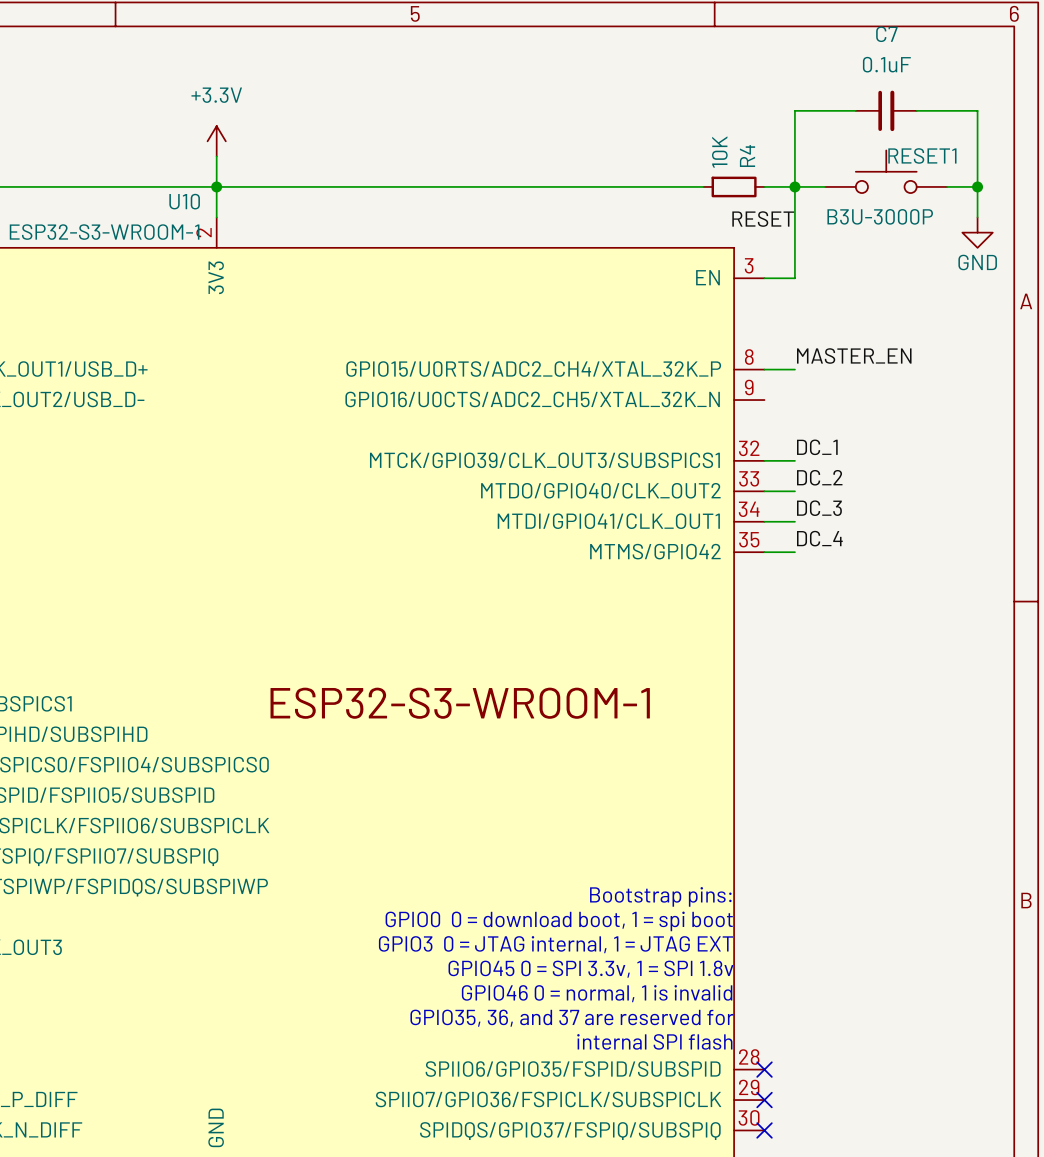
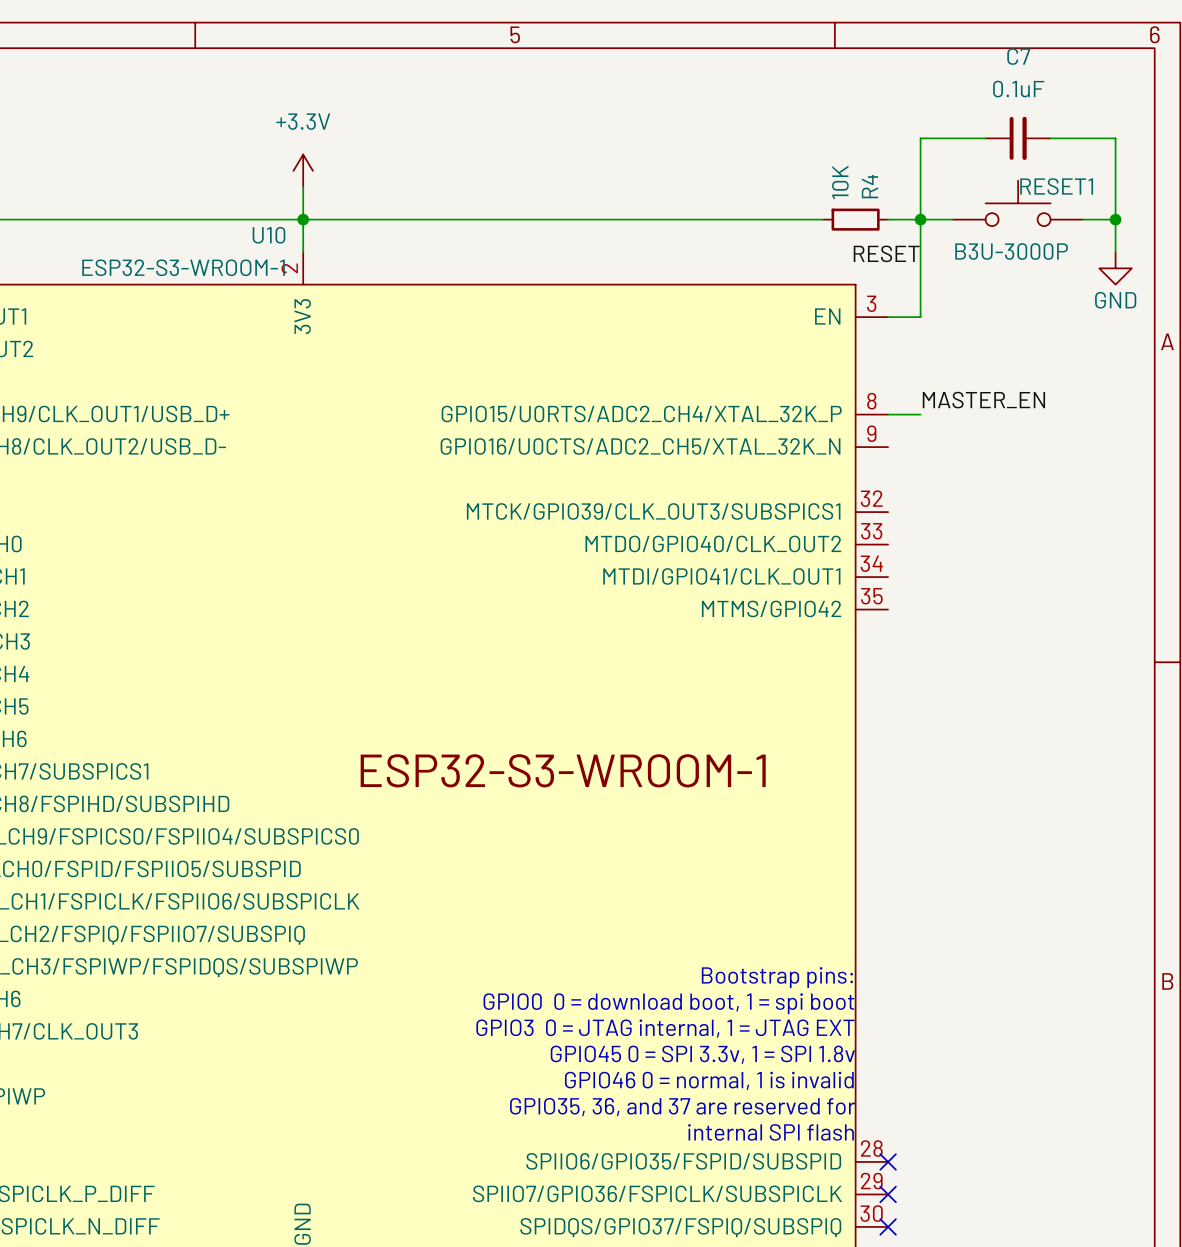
label: DC_1 (817, 447) -> none
wire: (764, 460) (794, 460) -> none
label: DC_2 (819, 477) -> none
wire: (764, 491) (794, 491) -> none
label: DC_3 (819, 508) -> none
wire: (764, 521) (794, 521) -> none
label: DC_4 (819, 538) -> none
wire: (764, 552) (794, 552) -> none

